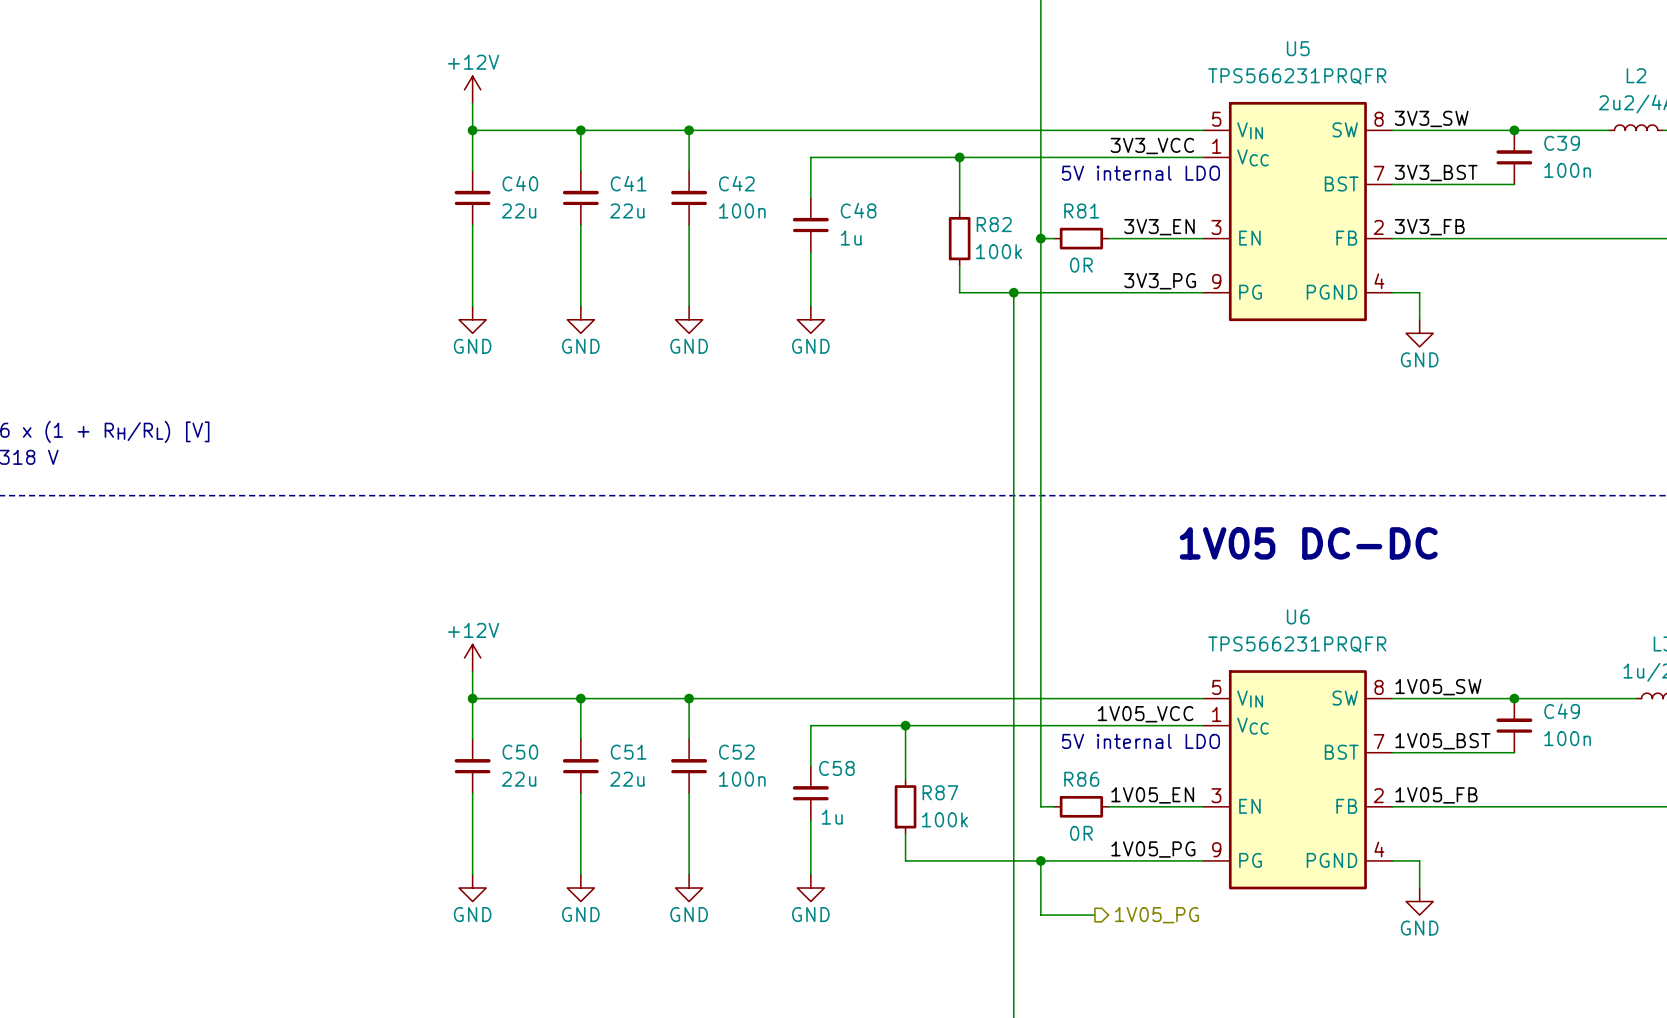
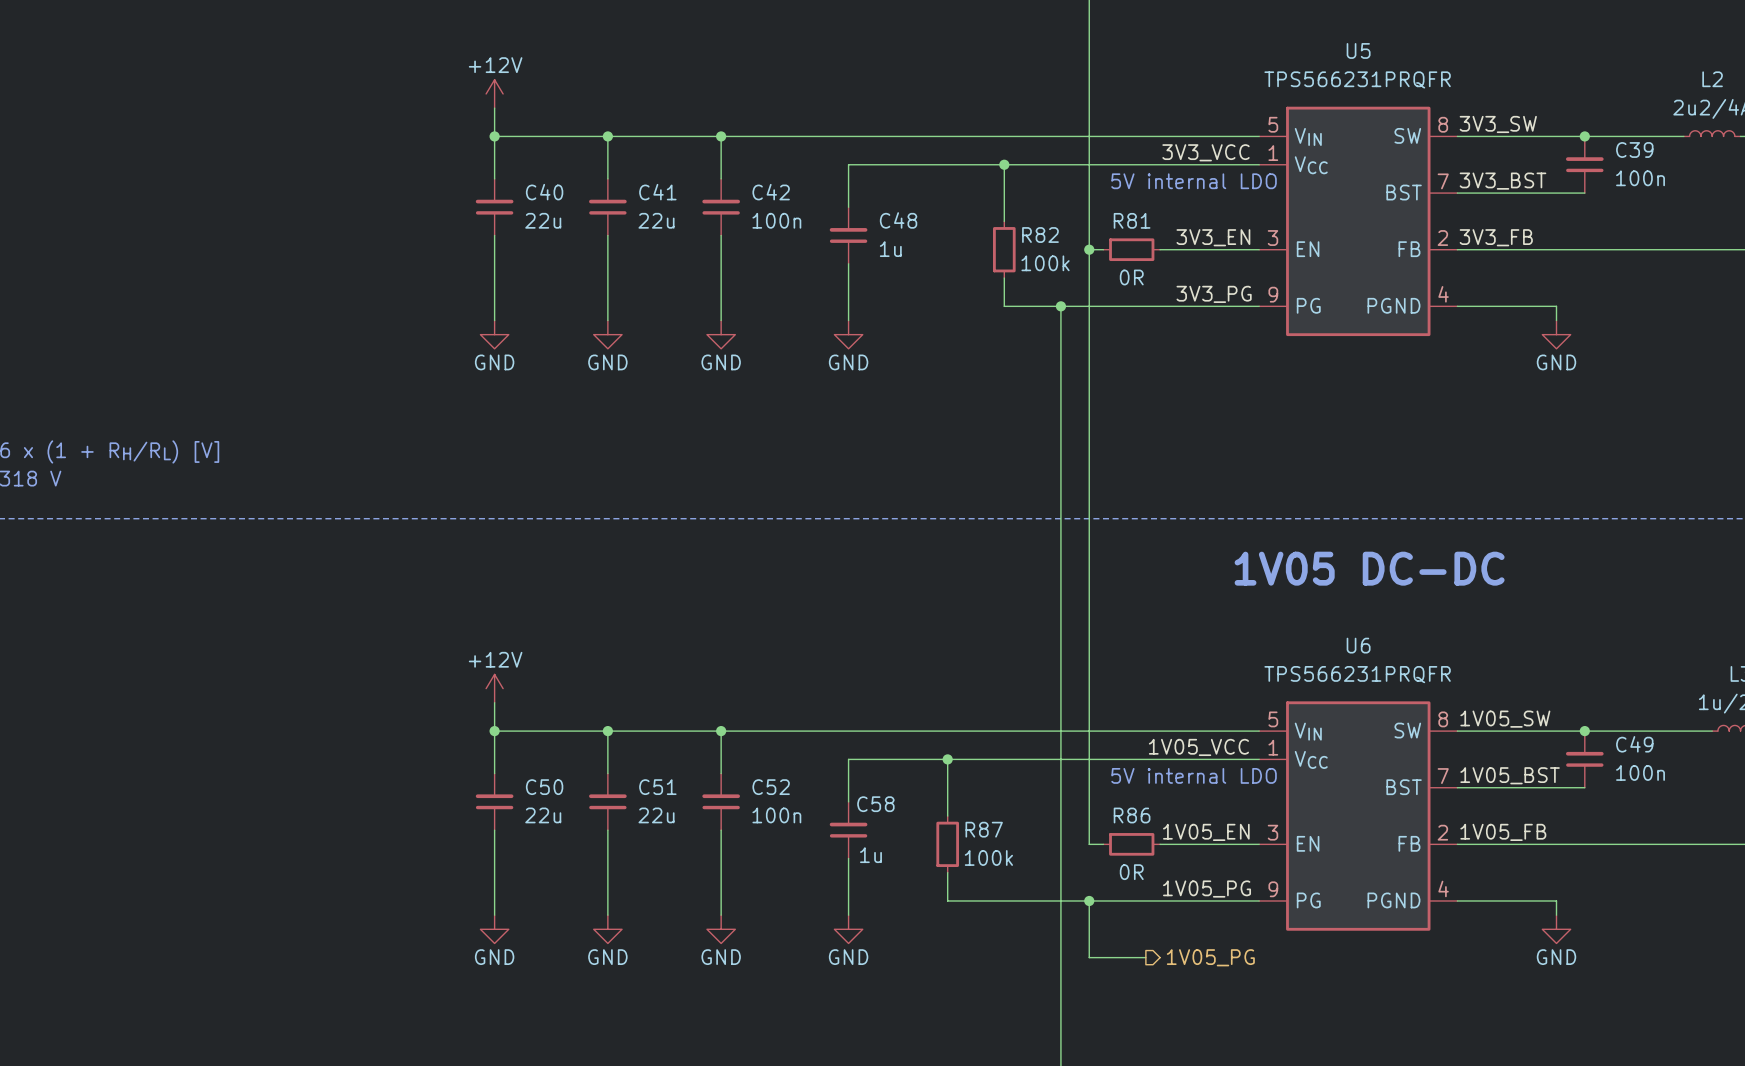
wire: (1419, 292) (1419, 319) -> (1485, 306) (1556, 306) (1556, 320)
power symbol position: GND (1419, 333) -> GND (1556, 334)
wire: (1419, 860) (1419, 888) -> (1485, 900) (1556, 900) (1556, 915)
power symbol position: GND (1419, 901) -> GND (1556, 929)

